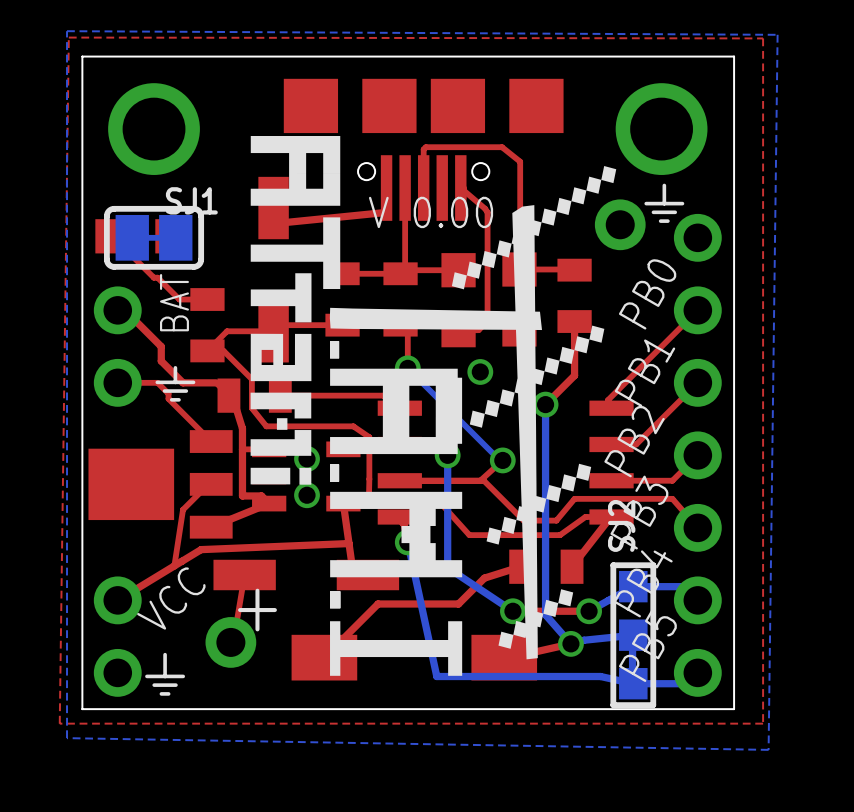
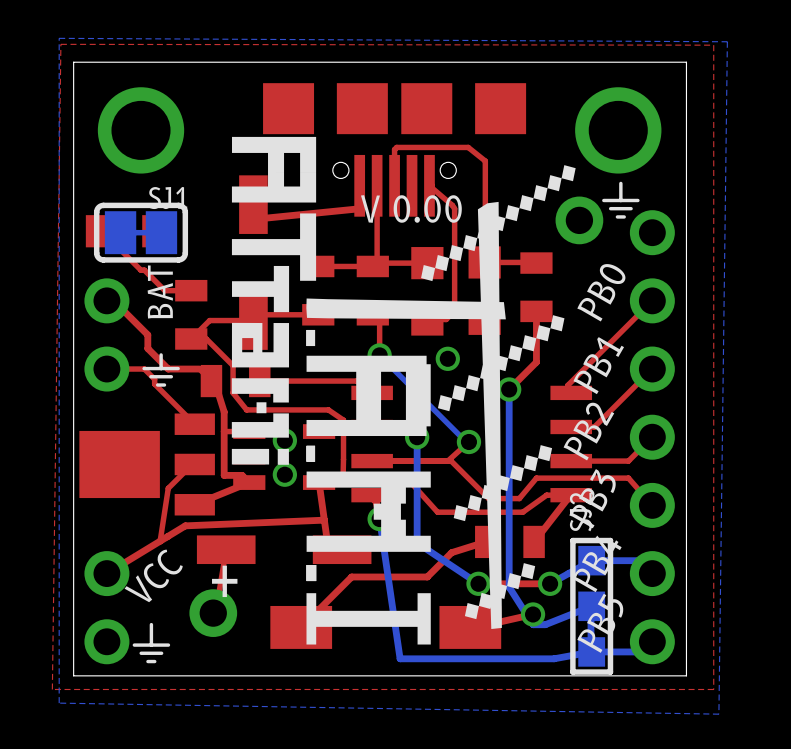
bottom track: (407, 542) (436, 676) (600, 676) (633, 683) -> (379, 519) (400, 658) (554, 658) (591, 651)
bottom track: (545, 614) (570, 643) (583, 640) (633, 635) -> (509, 587) (533, 624) (545, 624) (591, 606)

